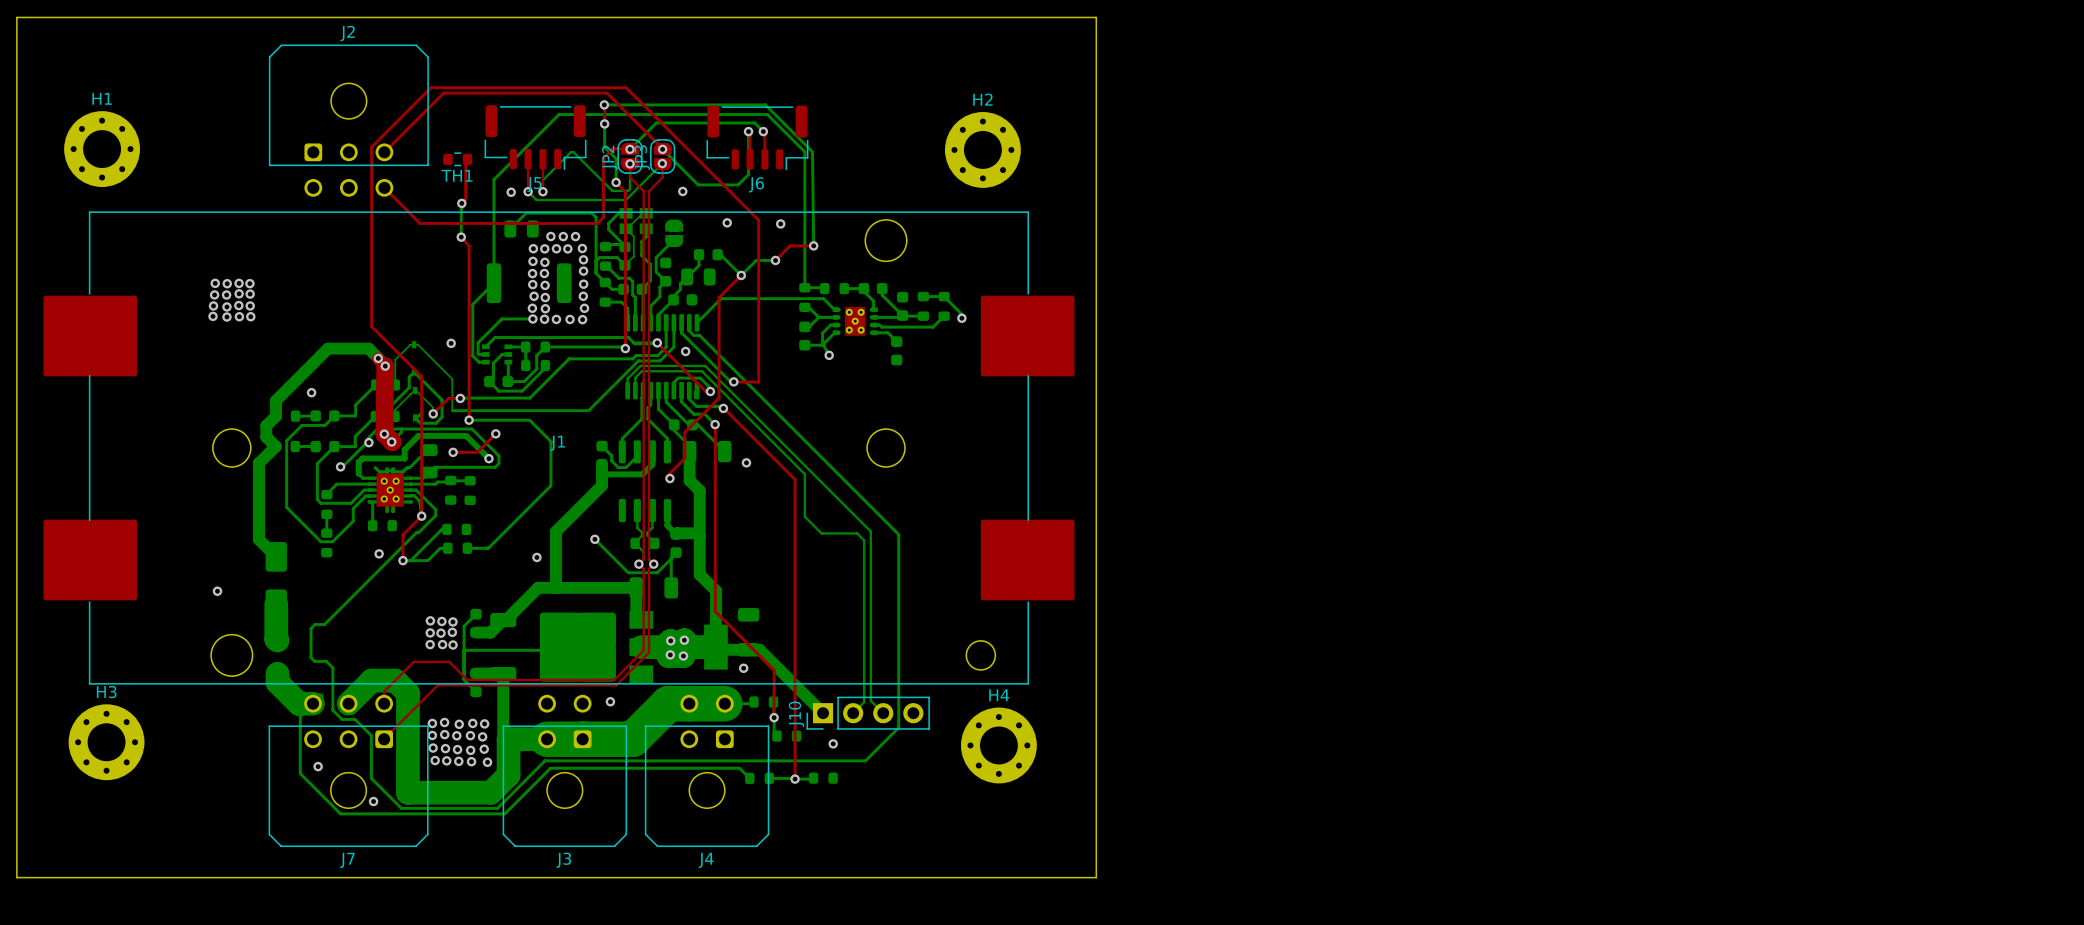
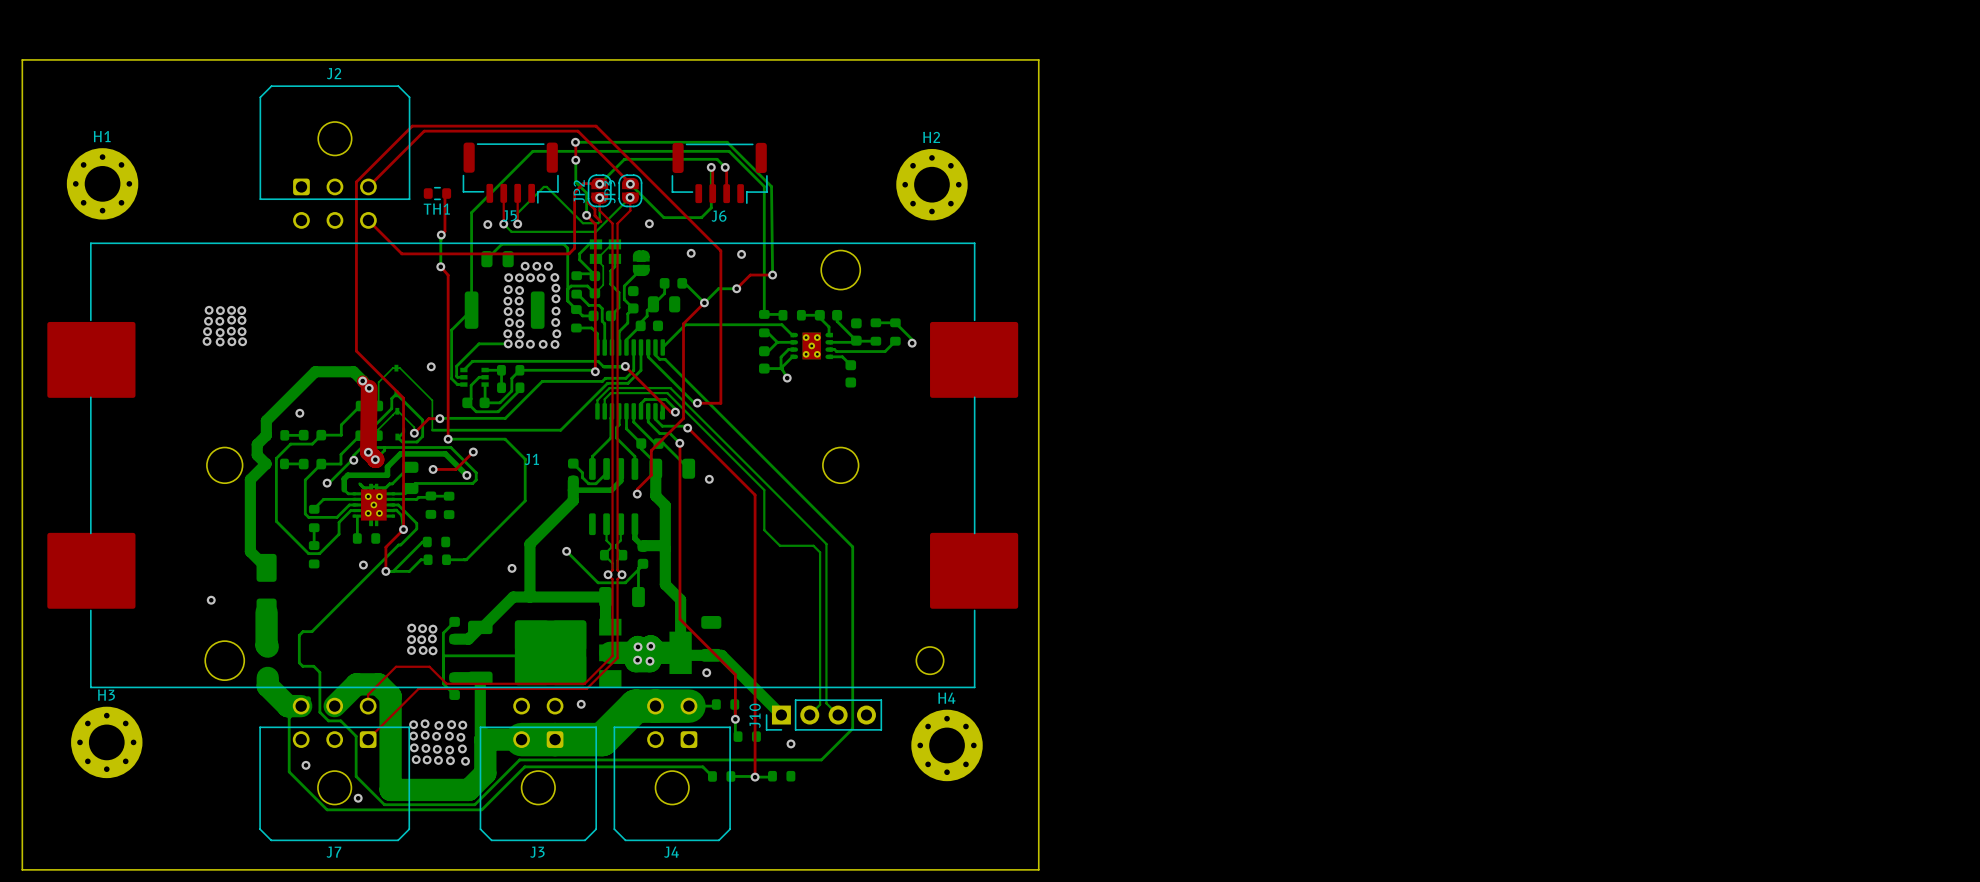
top track: none -> (587, 202) (594, 209) (594, 215) (600, 221)
via: (685, 351) -> none

